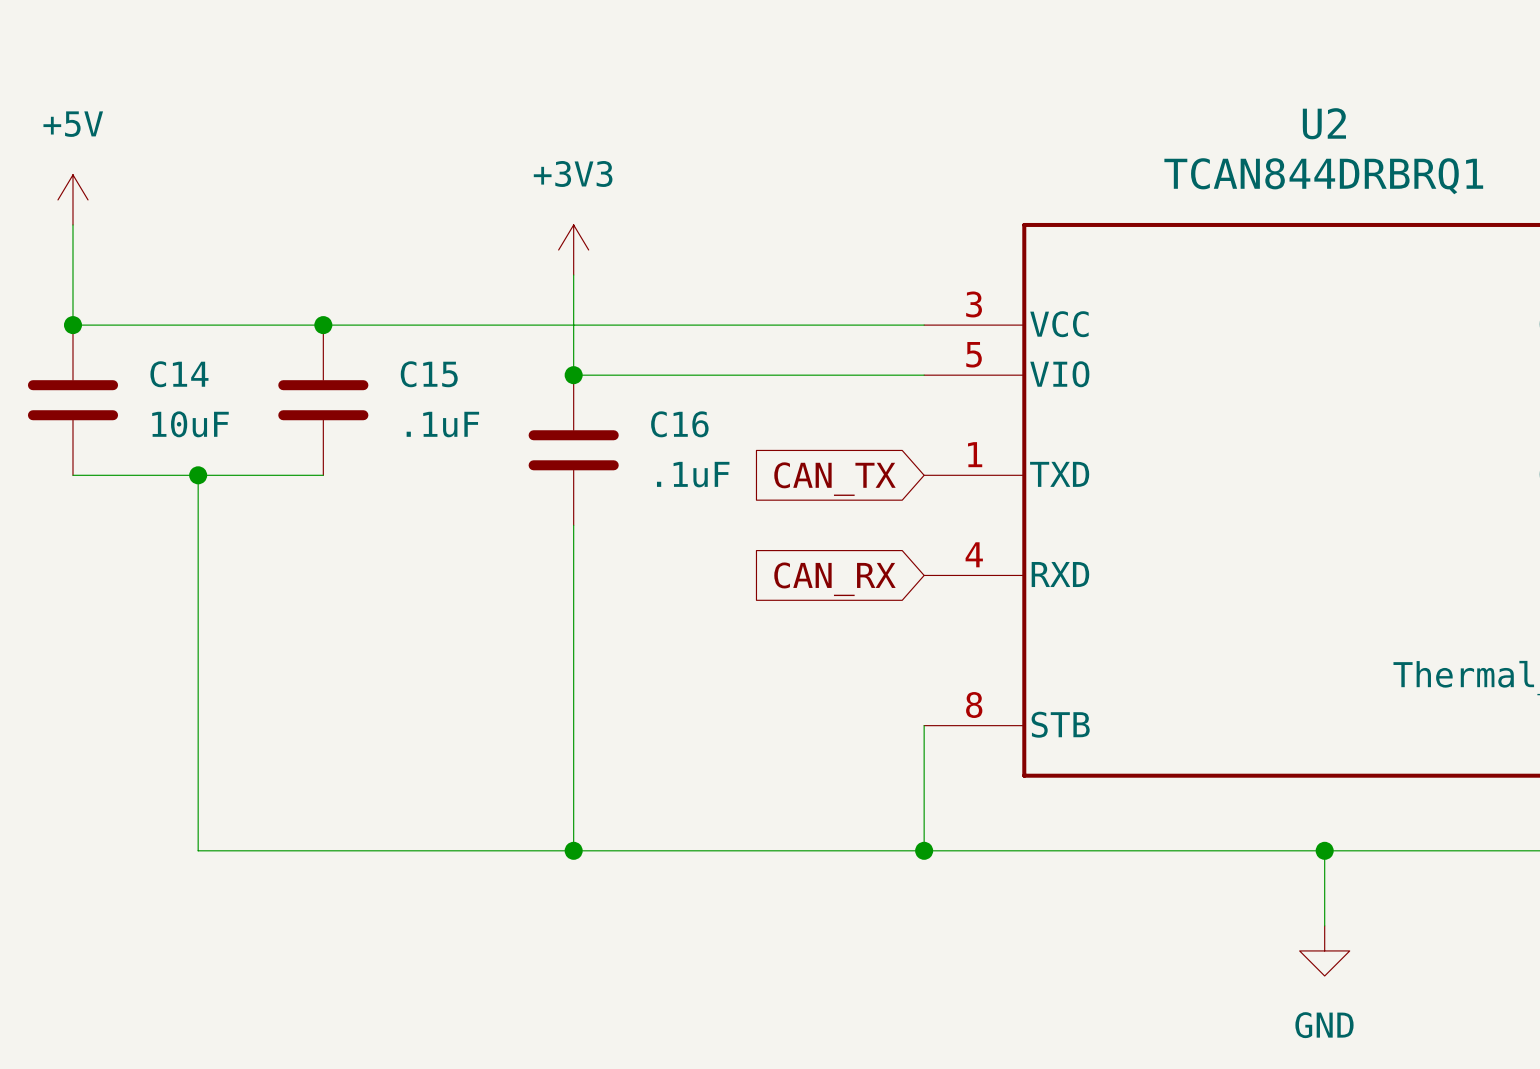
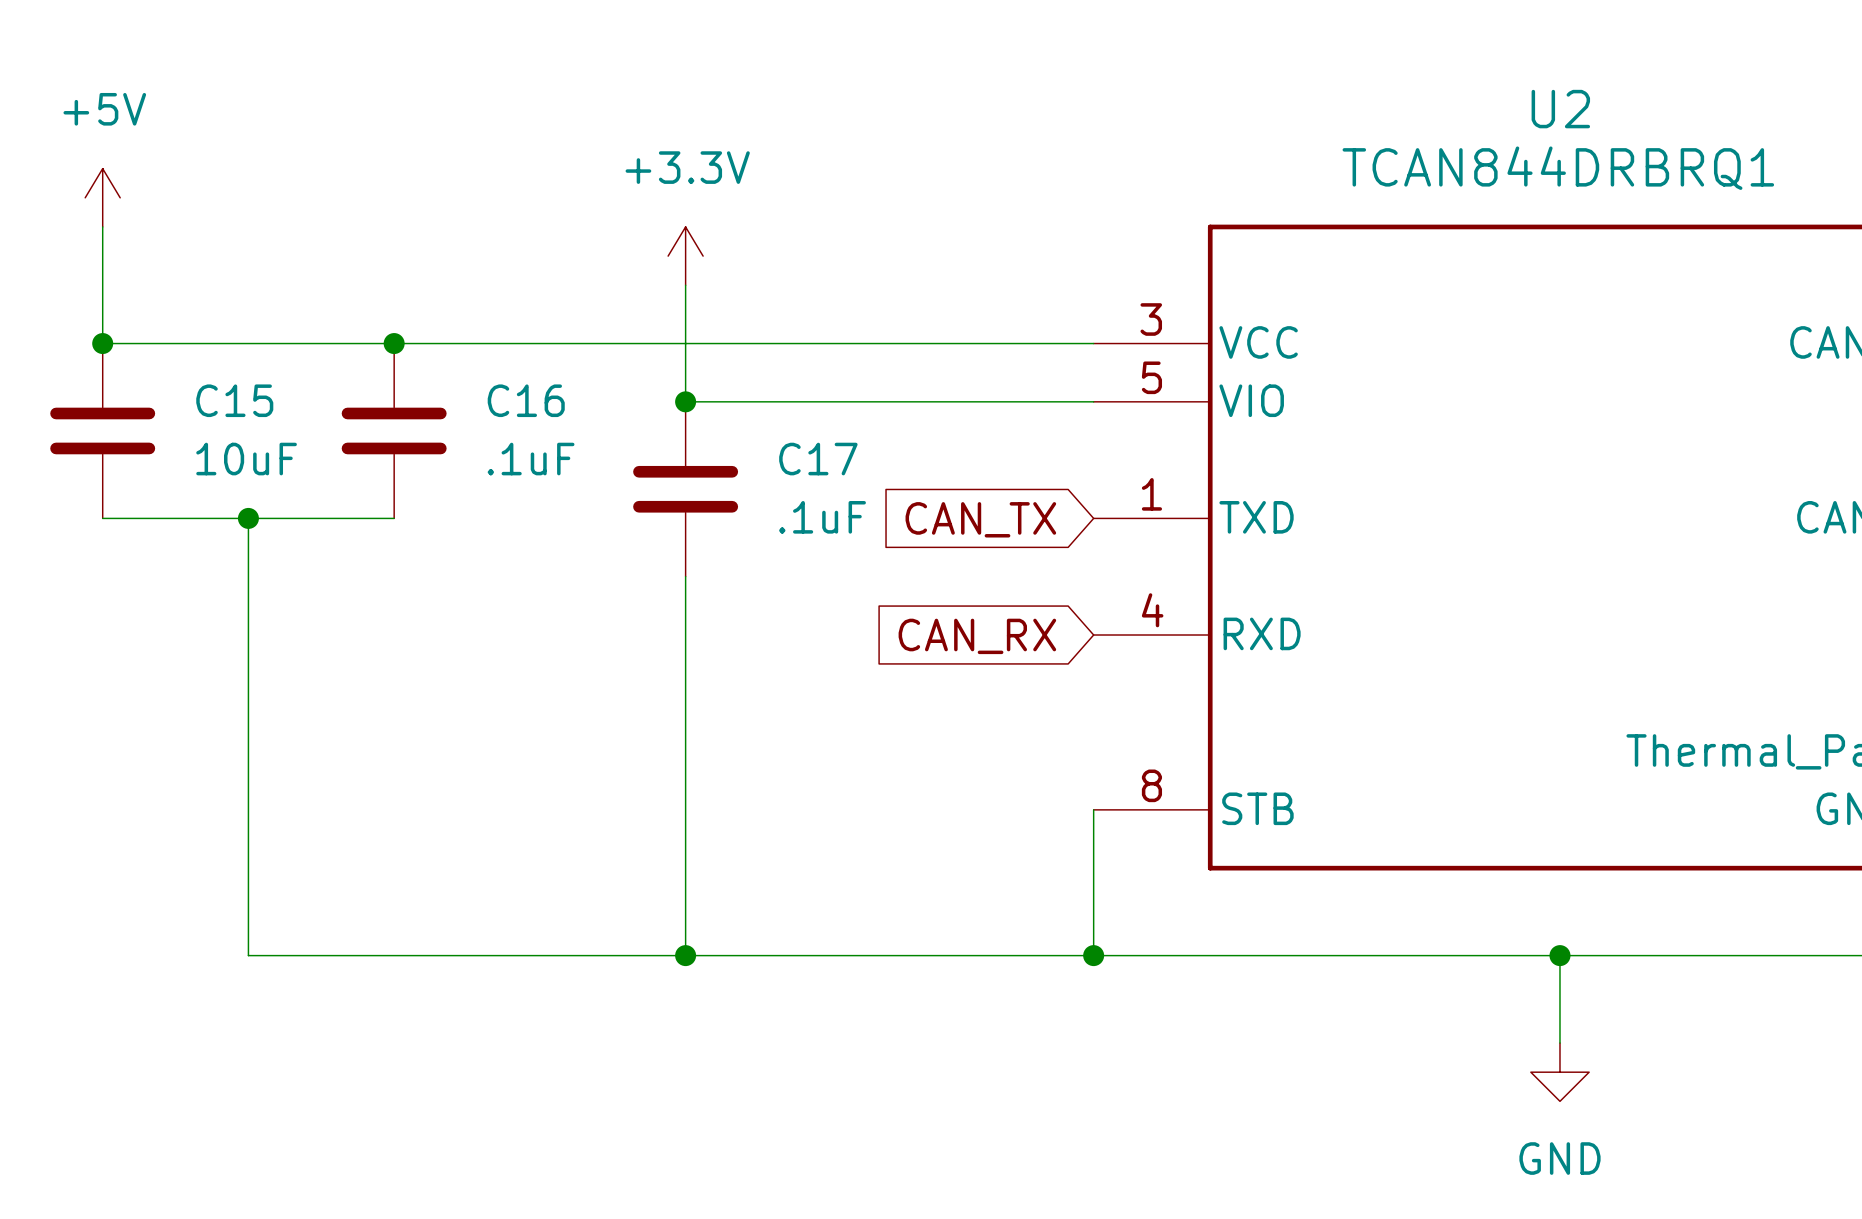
power symbol: +3V3 (573, 250) -> +3.3V (685, 256)
C14 name: C14 (179, 374) -> C15 (234, 400)
C15 name: C15 (429, 374) -> C16 (526, 400)
C16 name: C16 (679, 424) -> C17 (818, 459)

